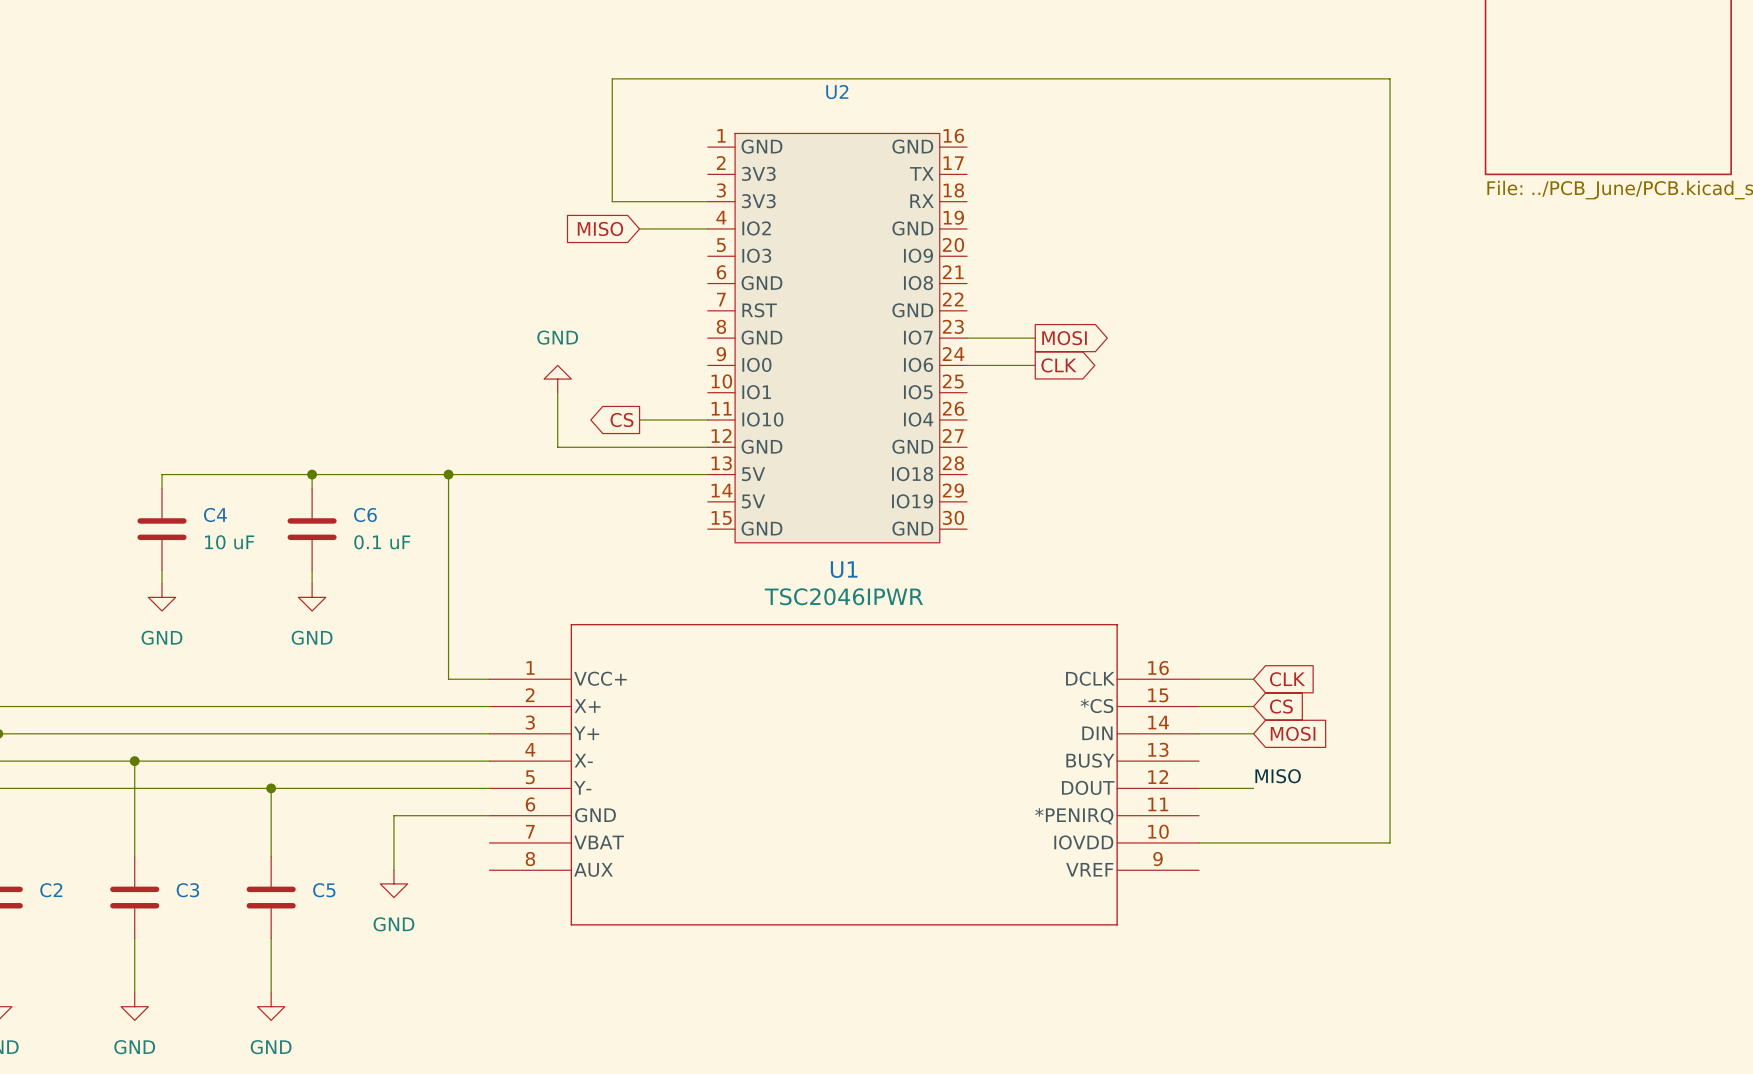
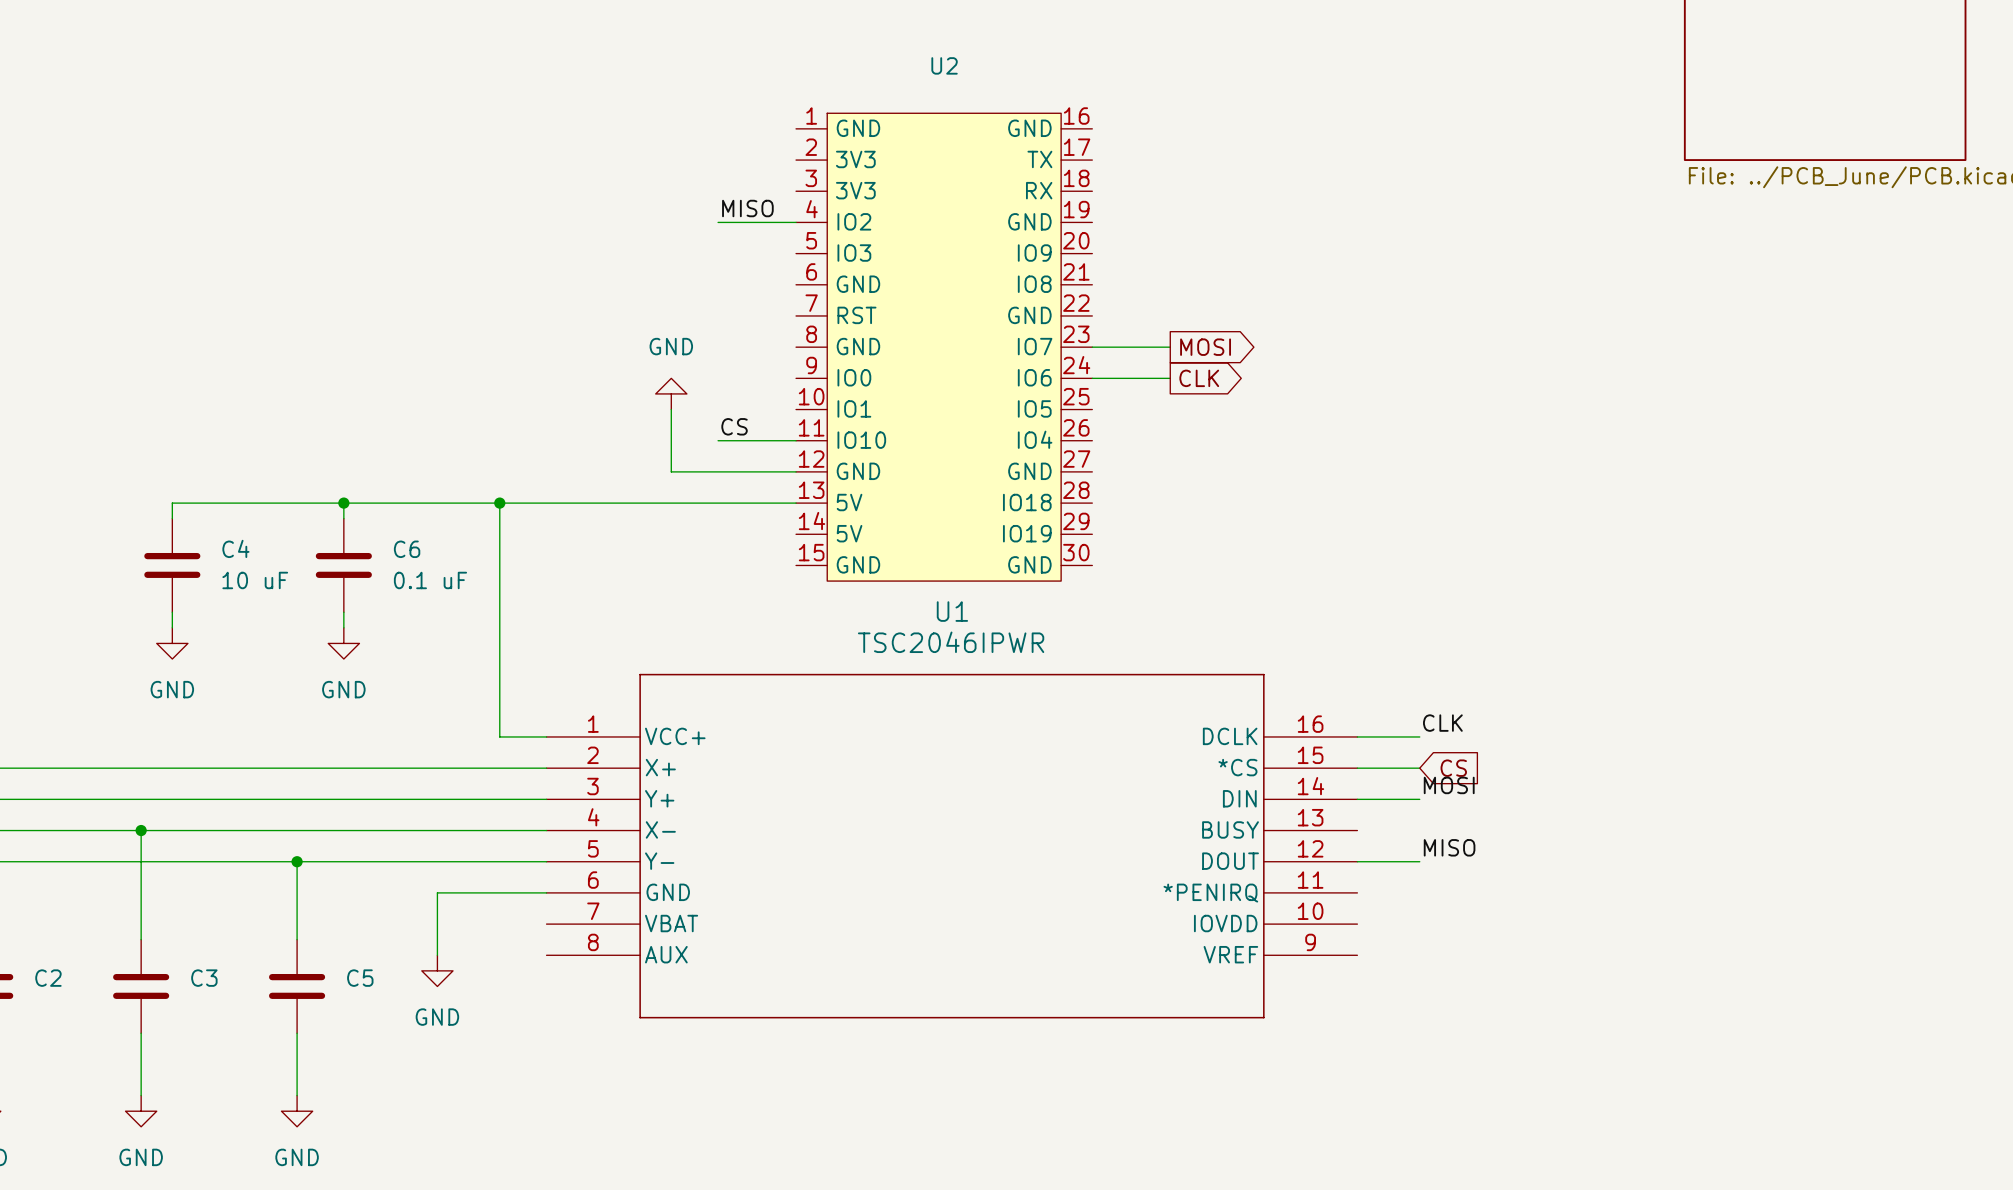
wire: (707, 201) (612, 201) (612, 78) (1390, 78) (1390, 842) (1199, 842) -> none
label: none -> MISO (747, 208)
global label: MISO (600, 228) -> none
power symbol position: GND (557, 379) -> GND (671, 393)
wire: (557, 392) (557, 447) (598, 447) -> (671, 409) (671, 471)
label: none -> CS (734, 426)
global label: CS (621, 420) -> none
label: none -> CLK (1442, 723)
global label: CLK (1287, 679) -> none
label: none -> MOSI (1449, 785)
global label: MOSI (1293, 733) -> none

